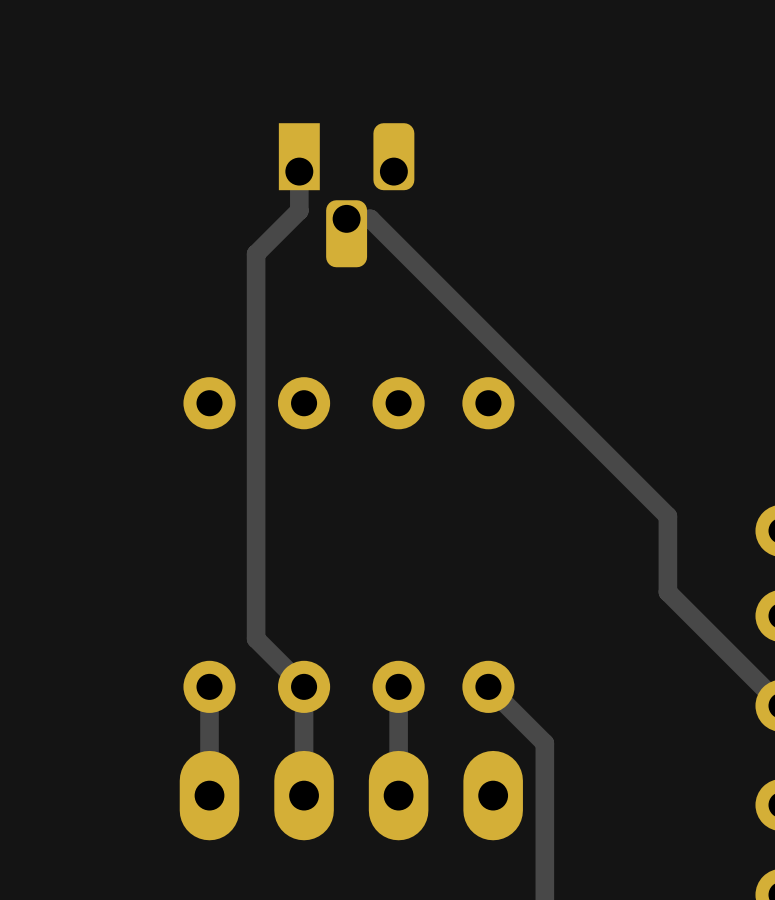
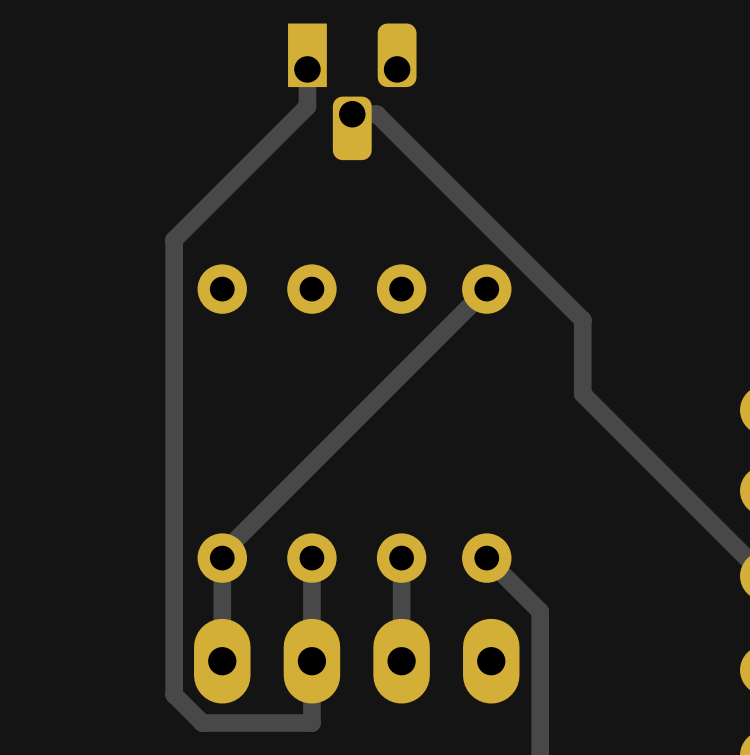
track: (370, 218) (667, 516) (667, 592) -> (374, 114) (582, 320) (582, 394) (656, 468)
track: (256, 253) (256, 638) (304, 686) -> (266, 147) (174, 239) (174, 694) (202, 723) (311, 723) (311, 661)
track: none -> (486, 289) (222, 553) (222, 558)

